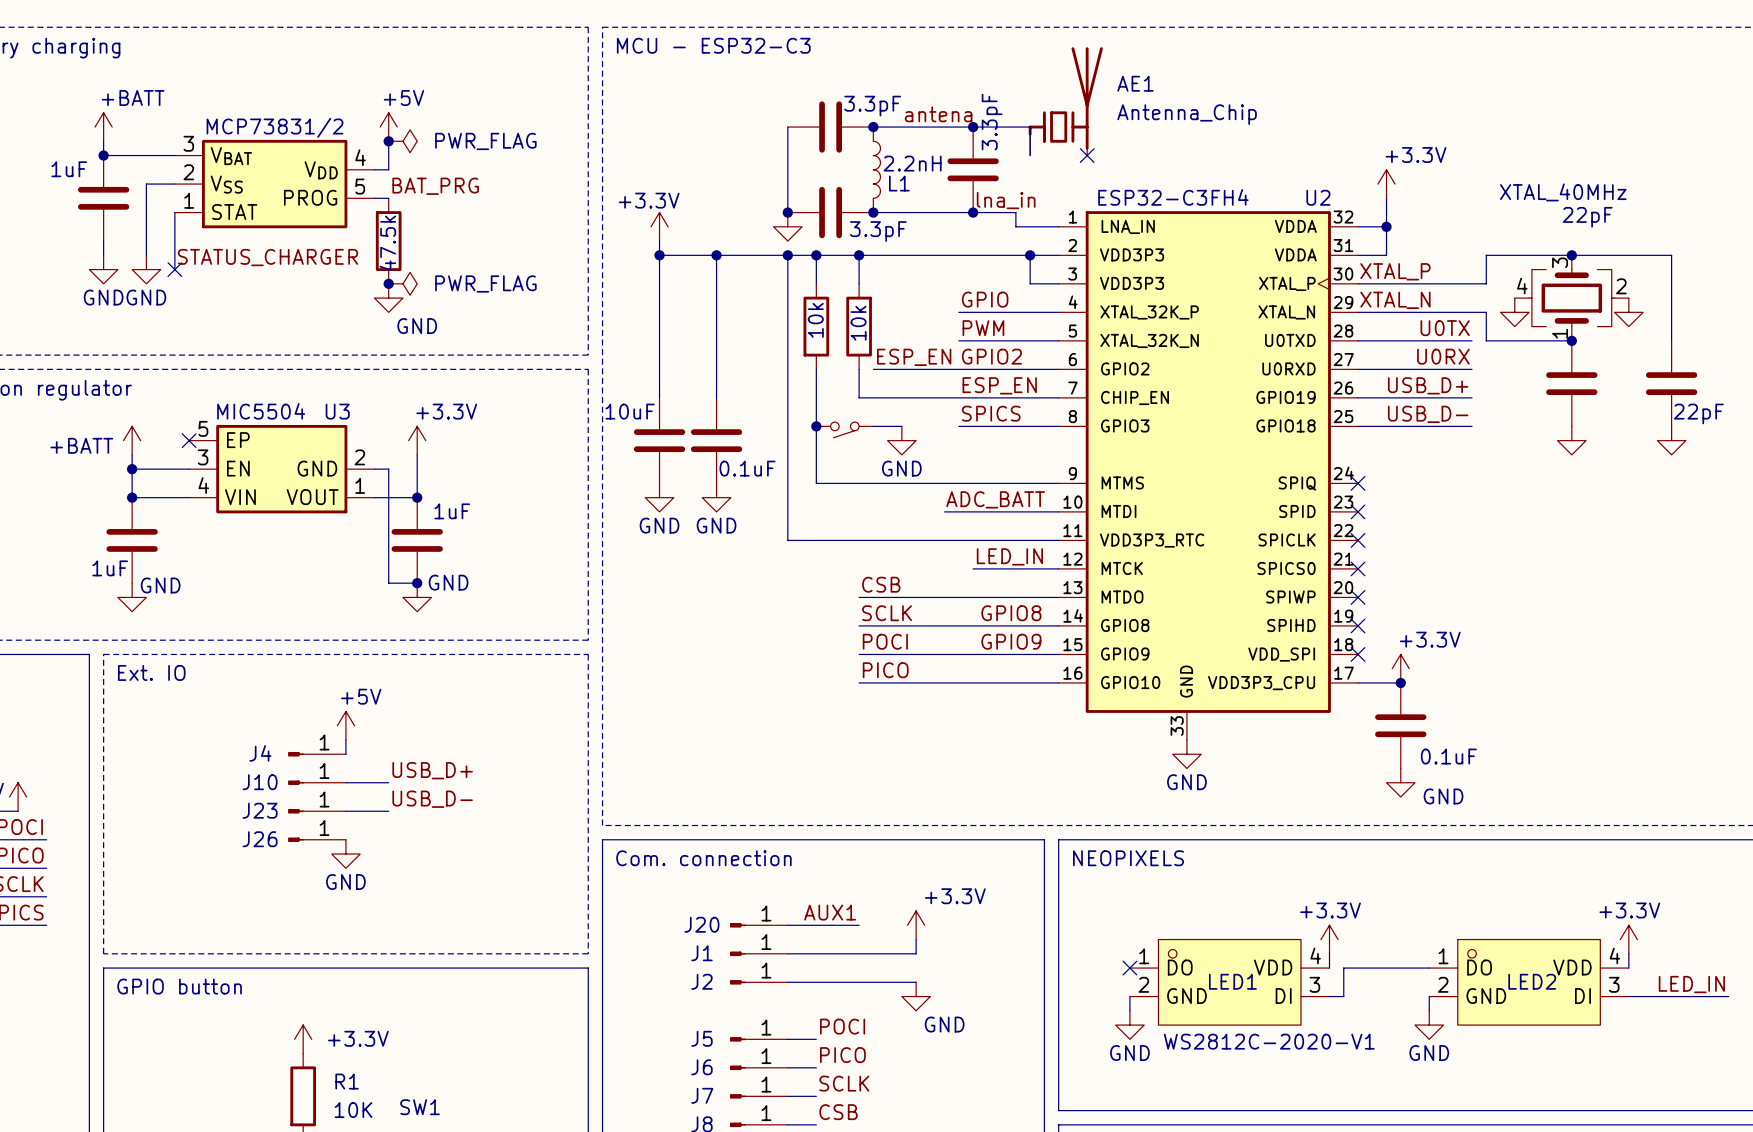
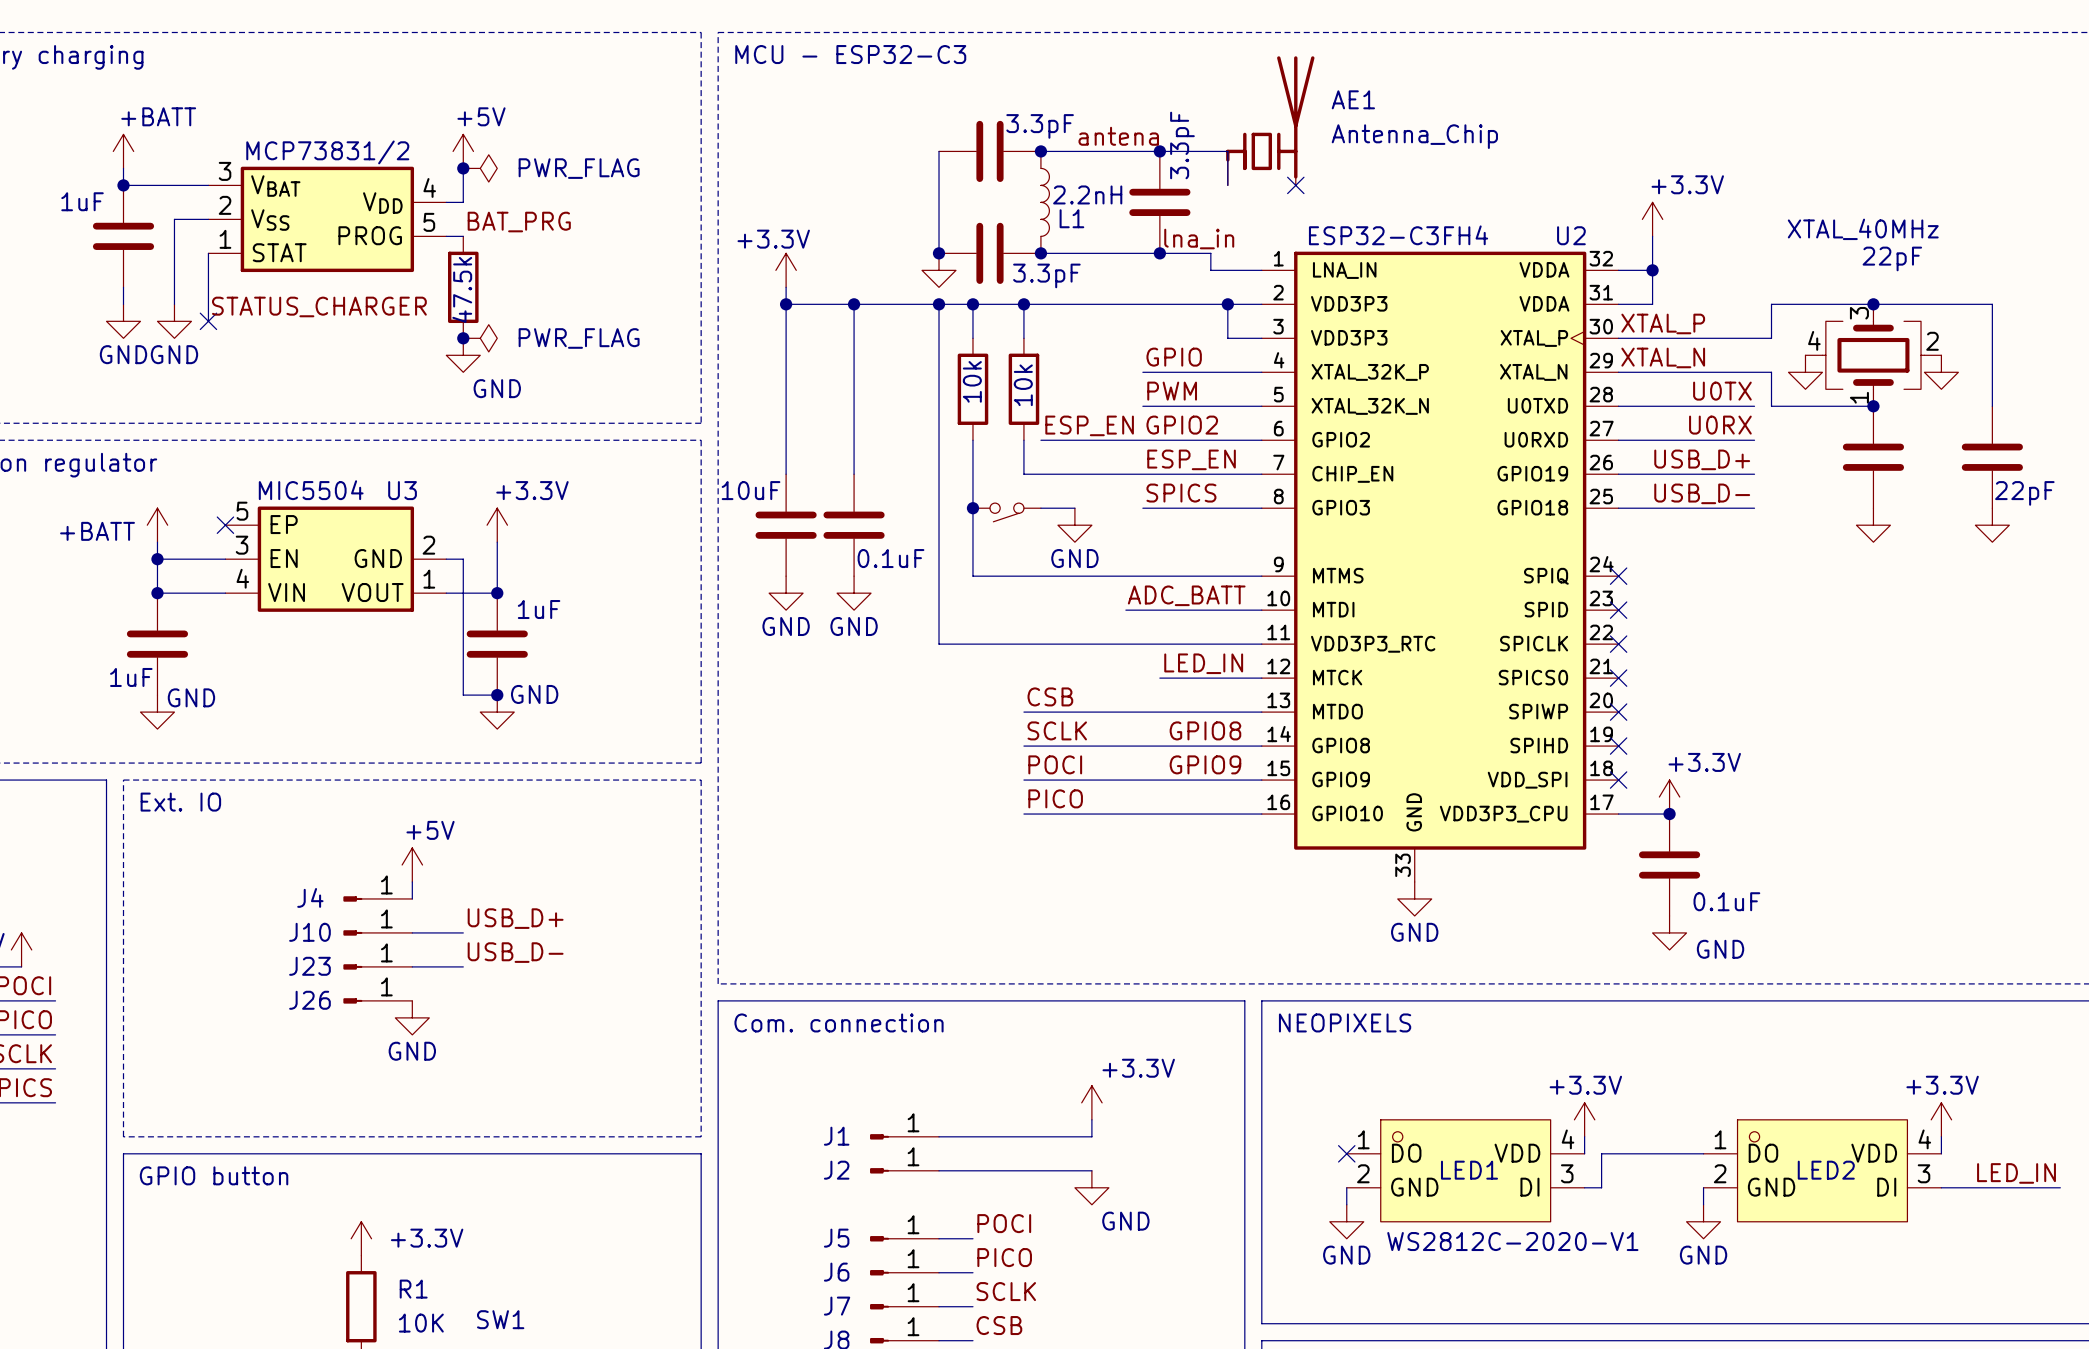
label: AUX1 (830, 912) -> none
J20: (758, 925) -> none
wire: (787, 925) (859, 925) -> none

